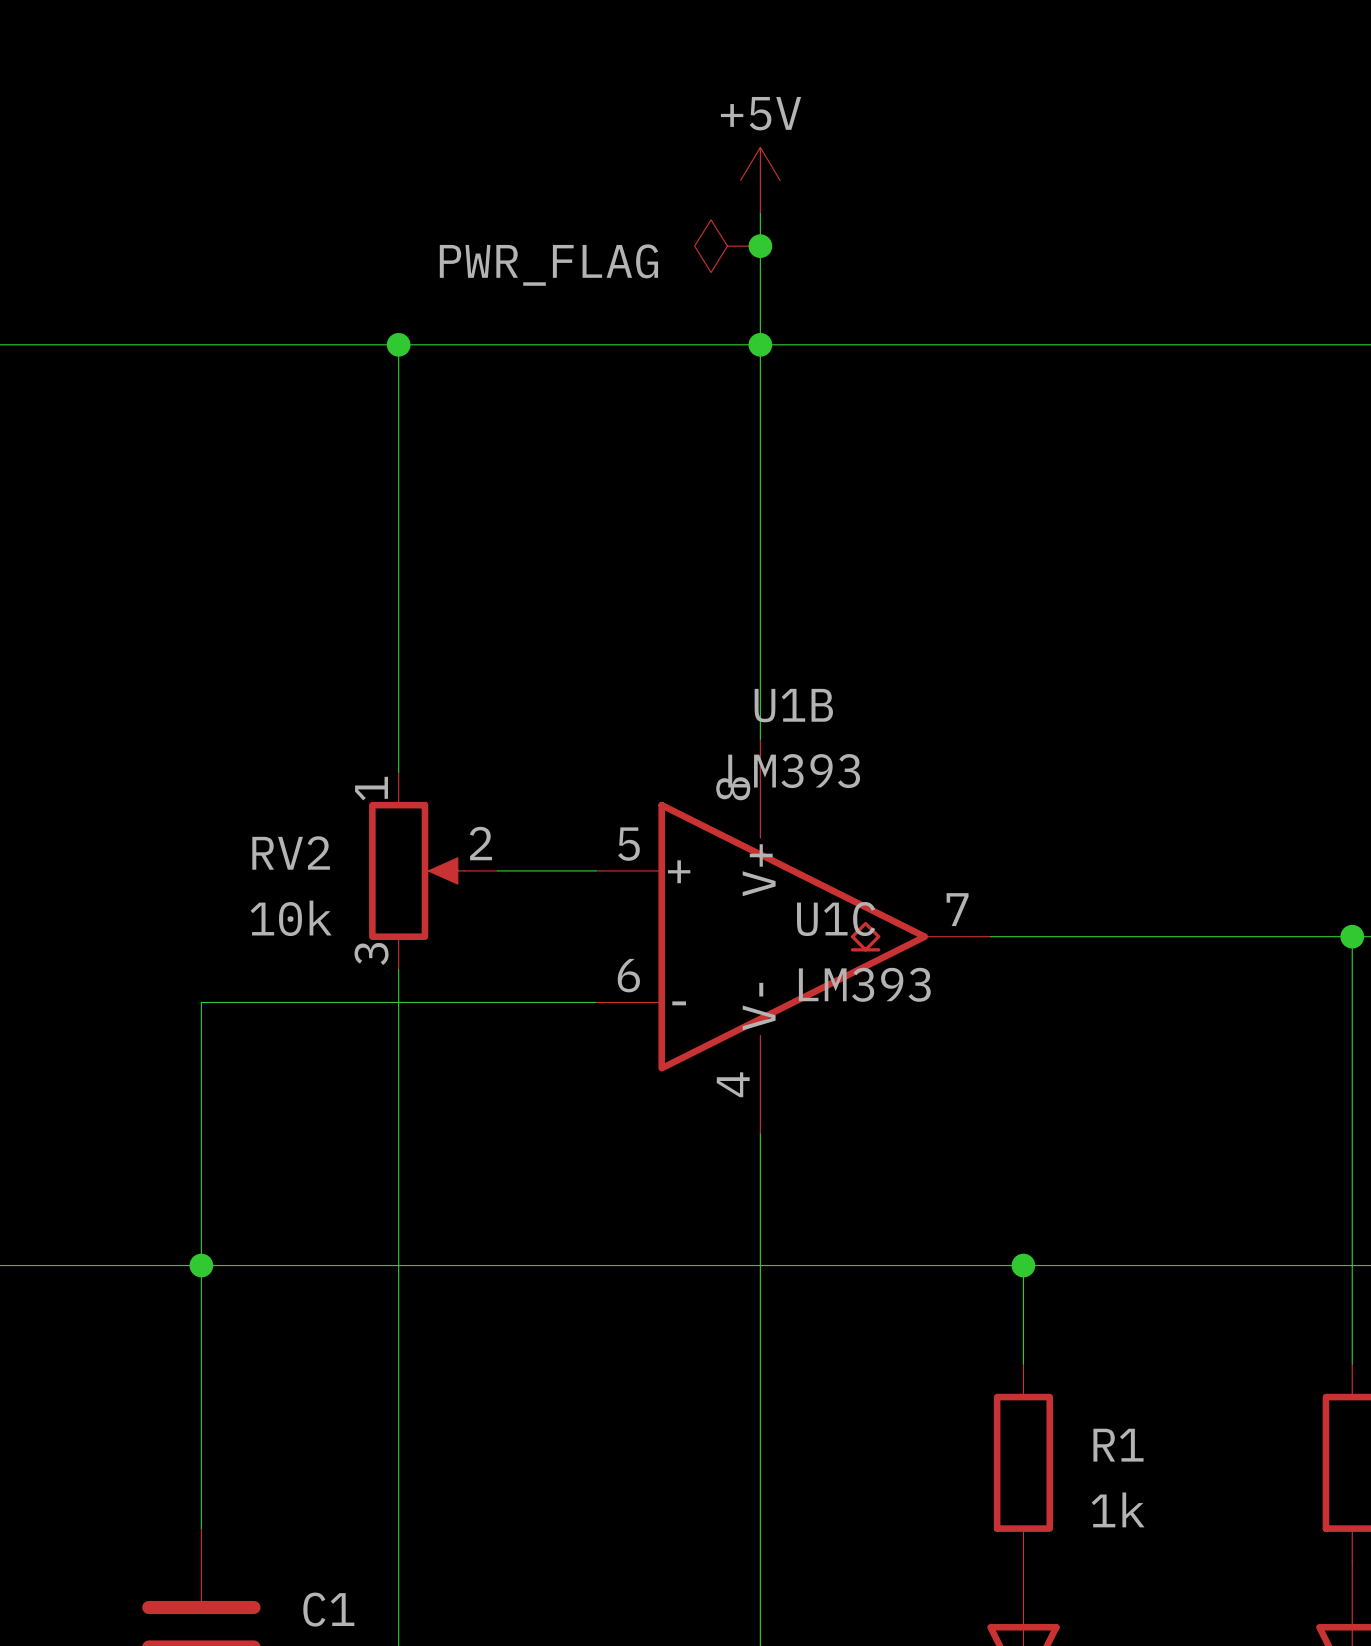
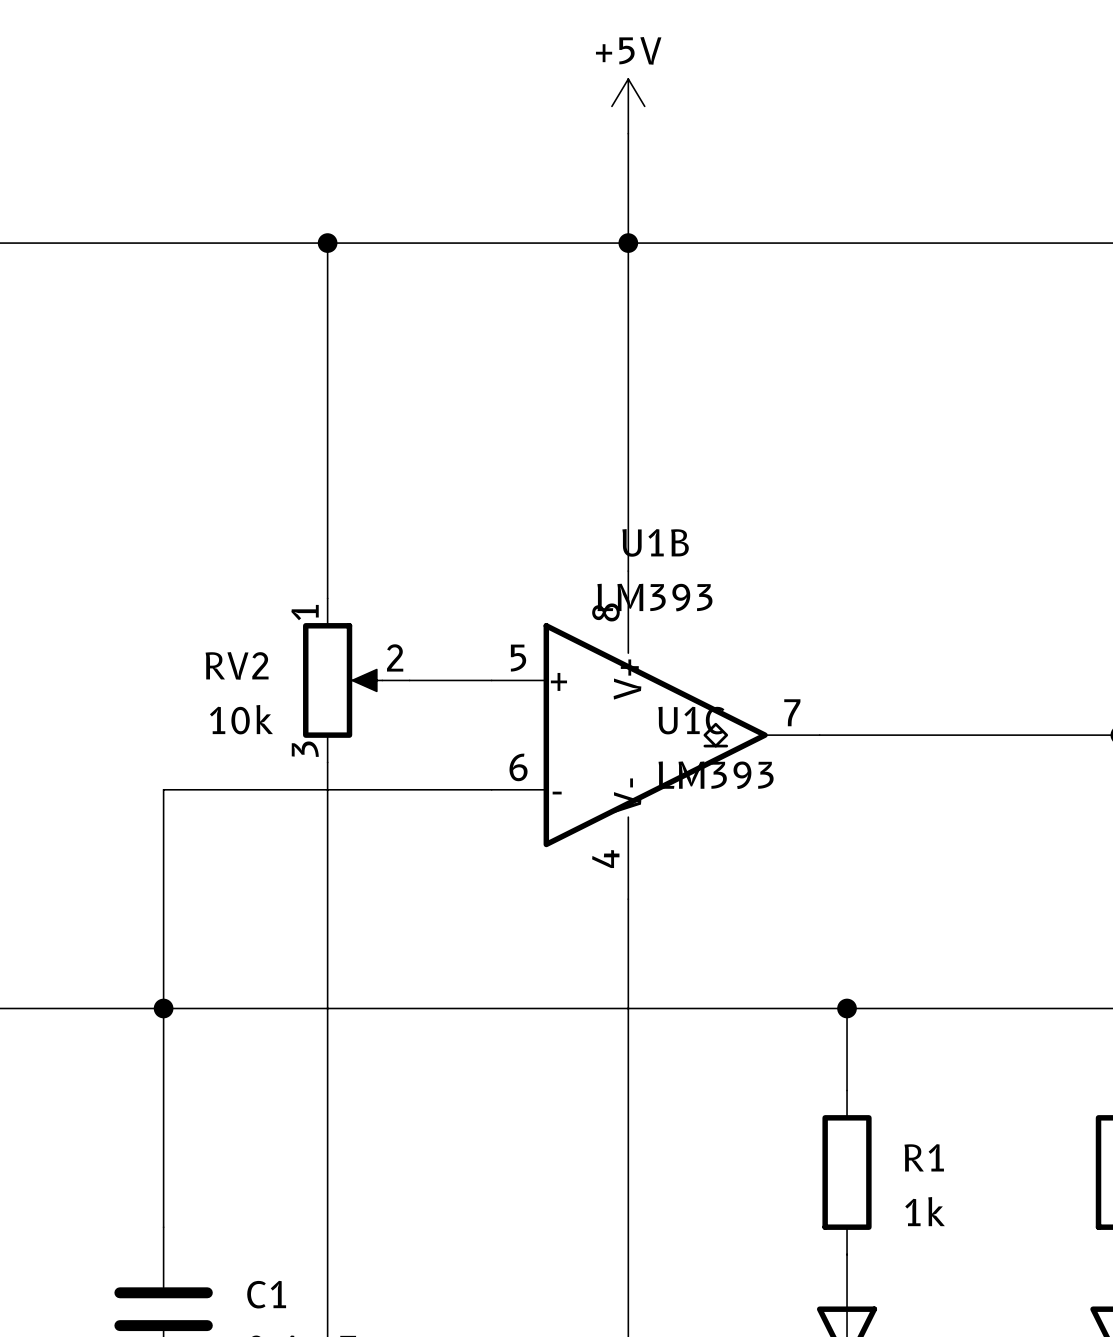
power symbol: PWR_FLAG (727, 246) -> none
junction: (760, 246) -> none

